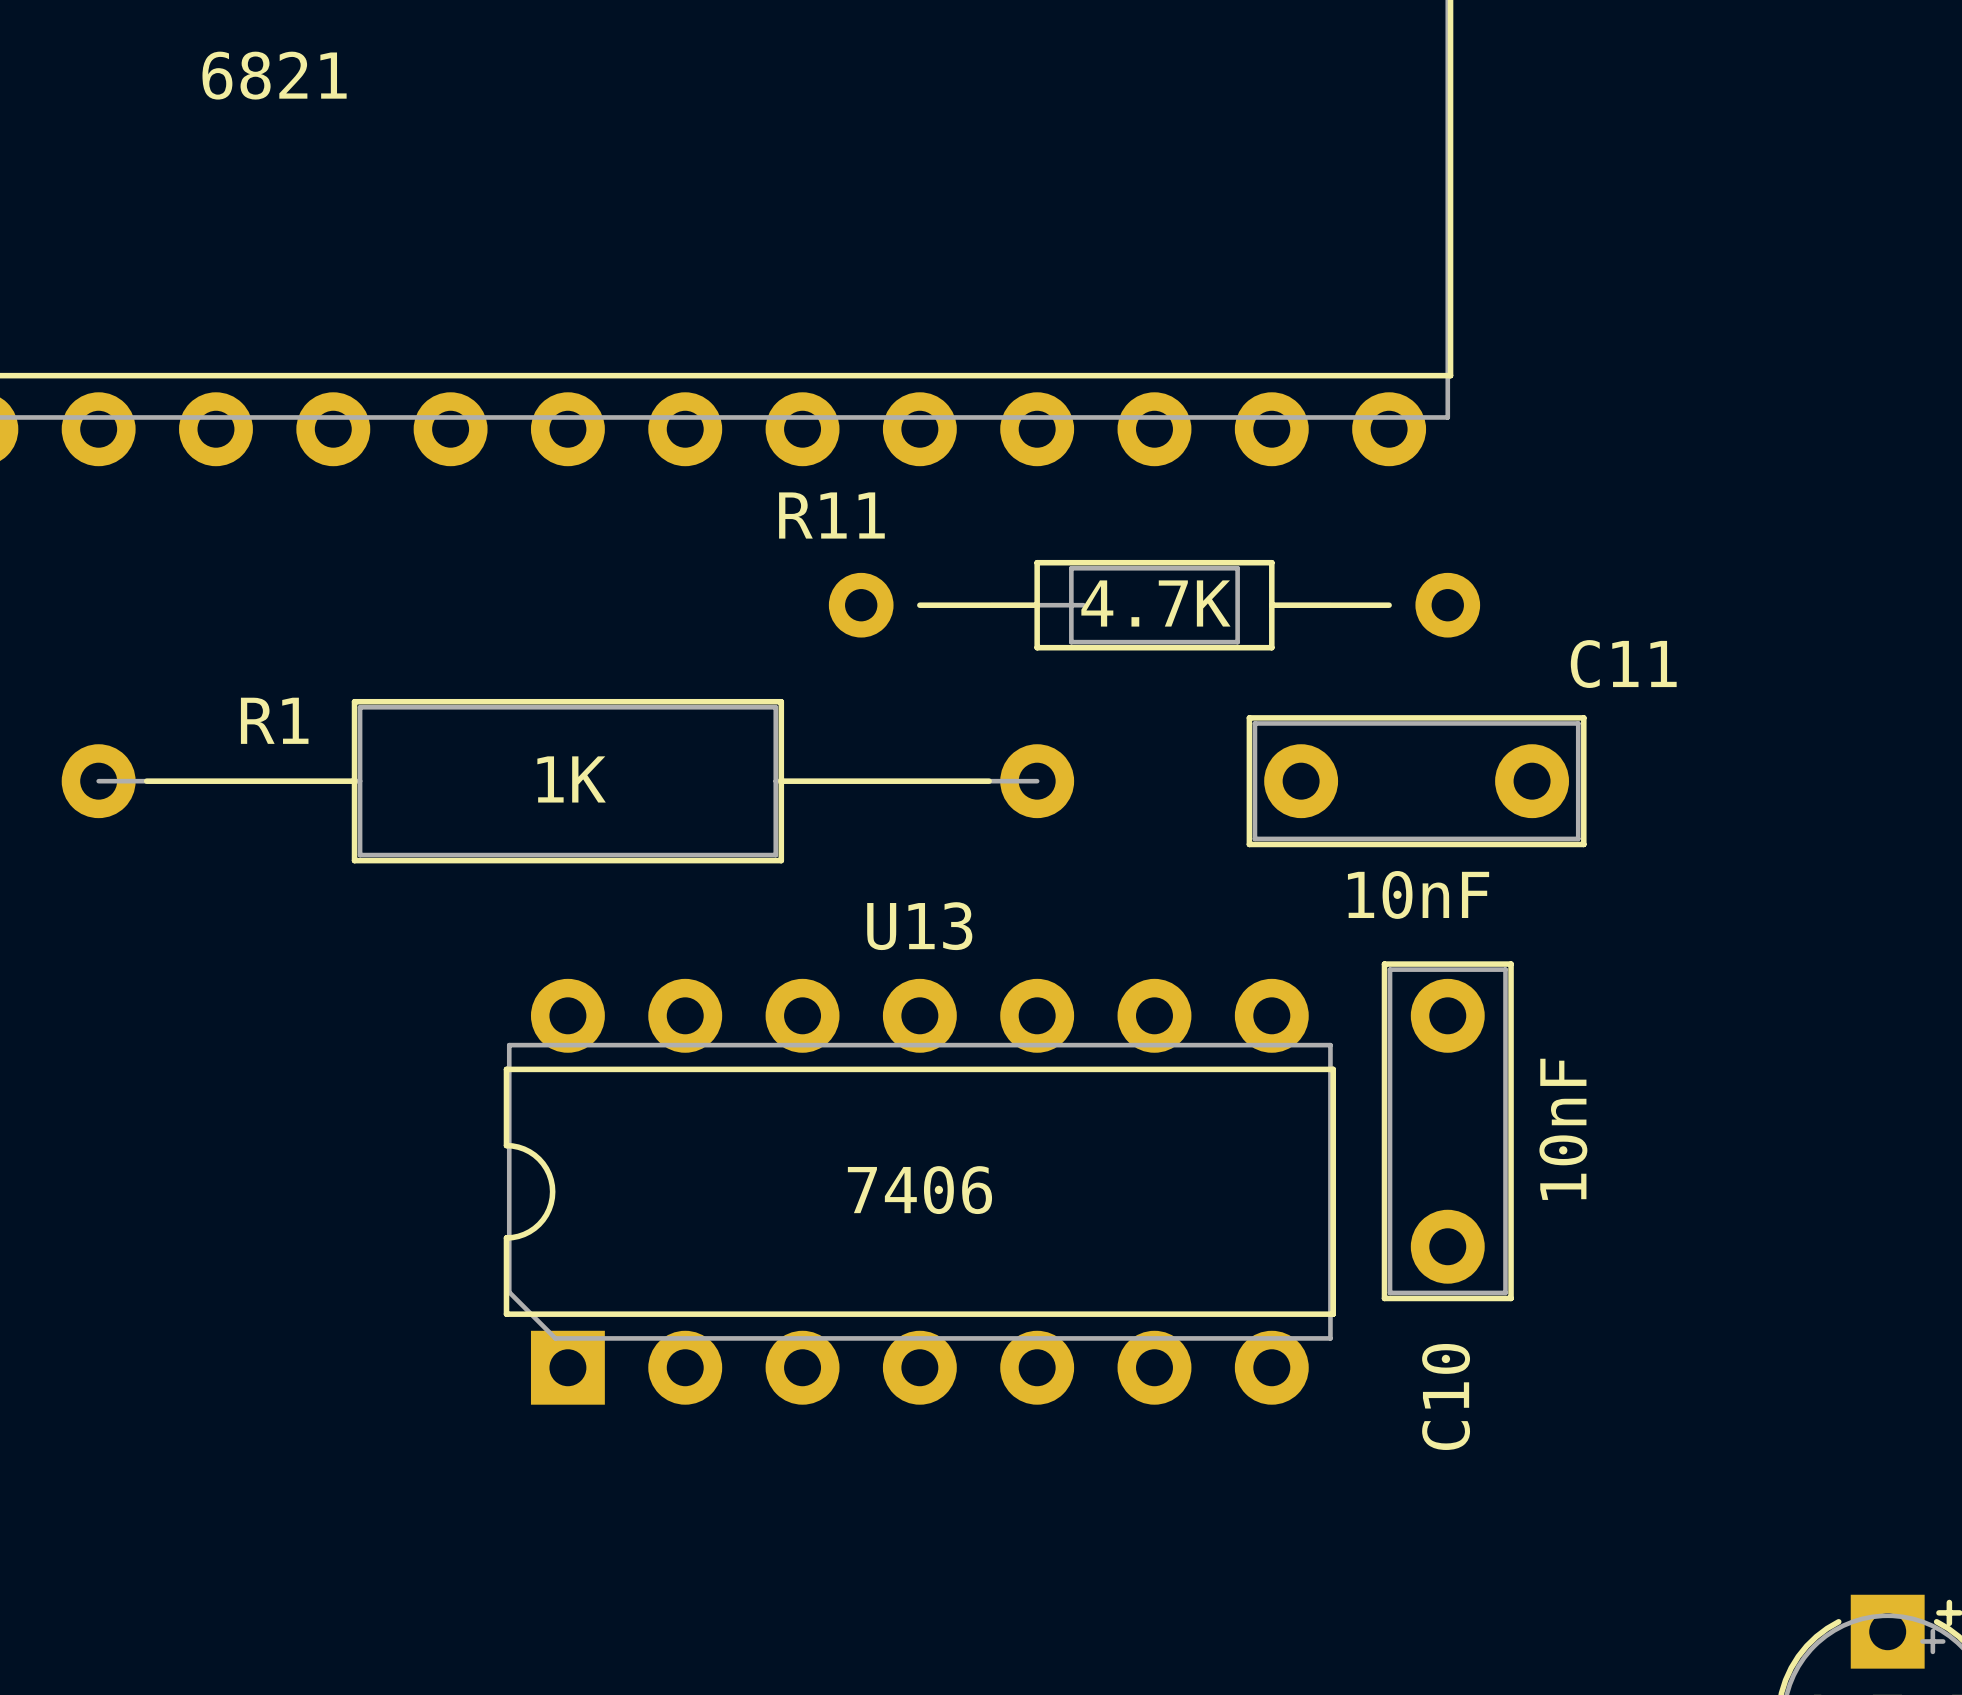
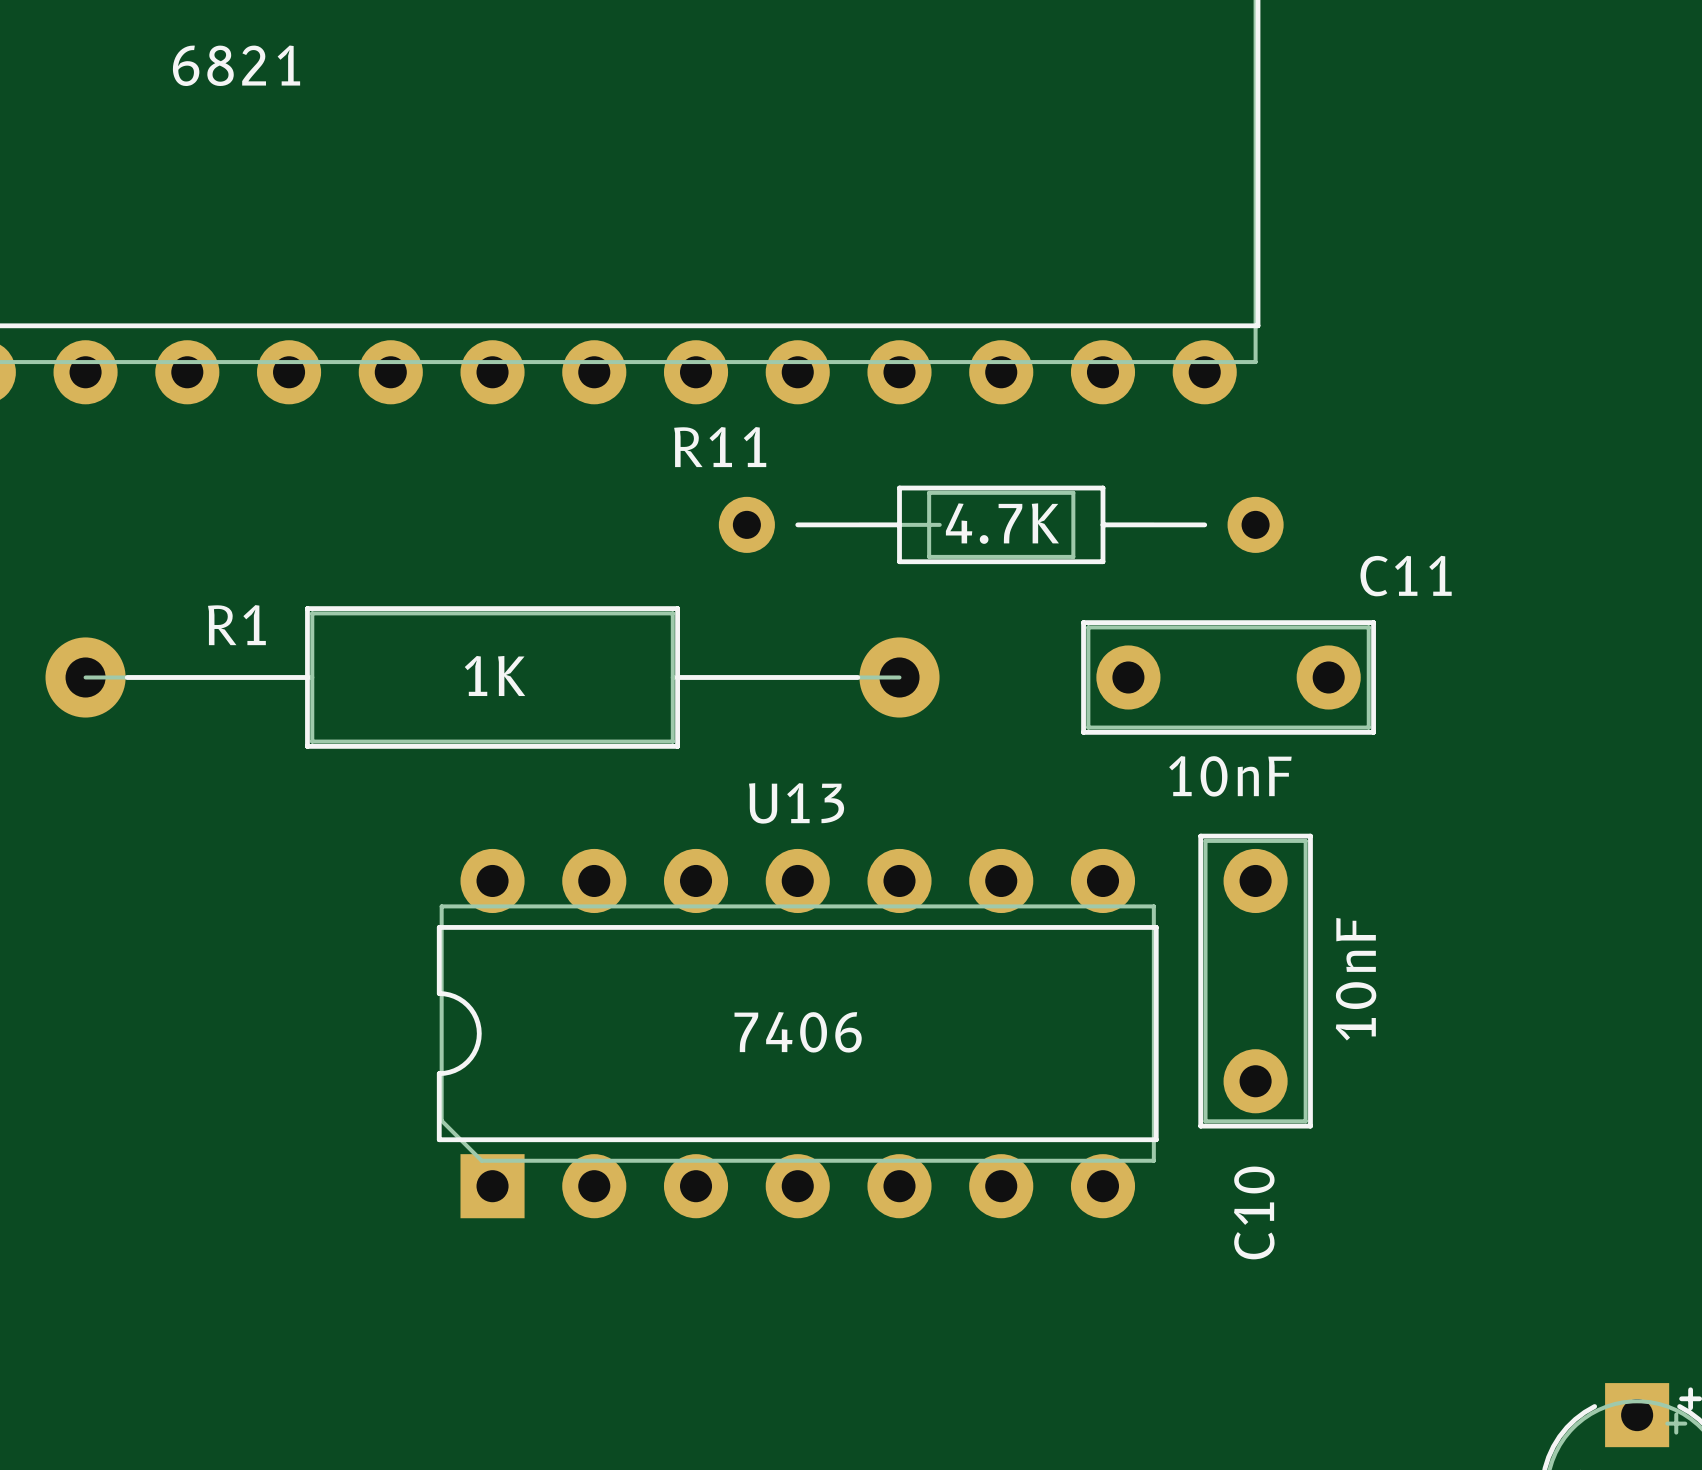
R1 footprint: [61, 698, 1075, 864] -> [45, 606, 940, 749]

